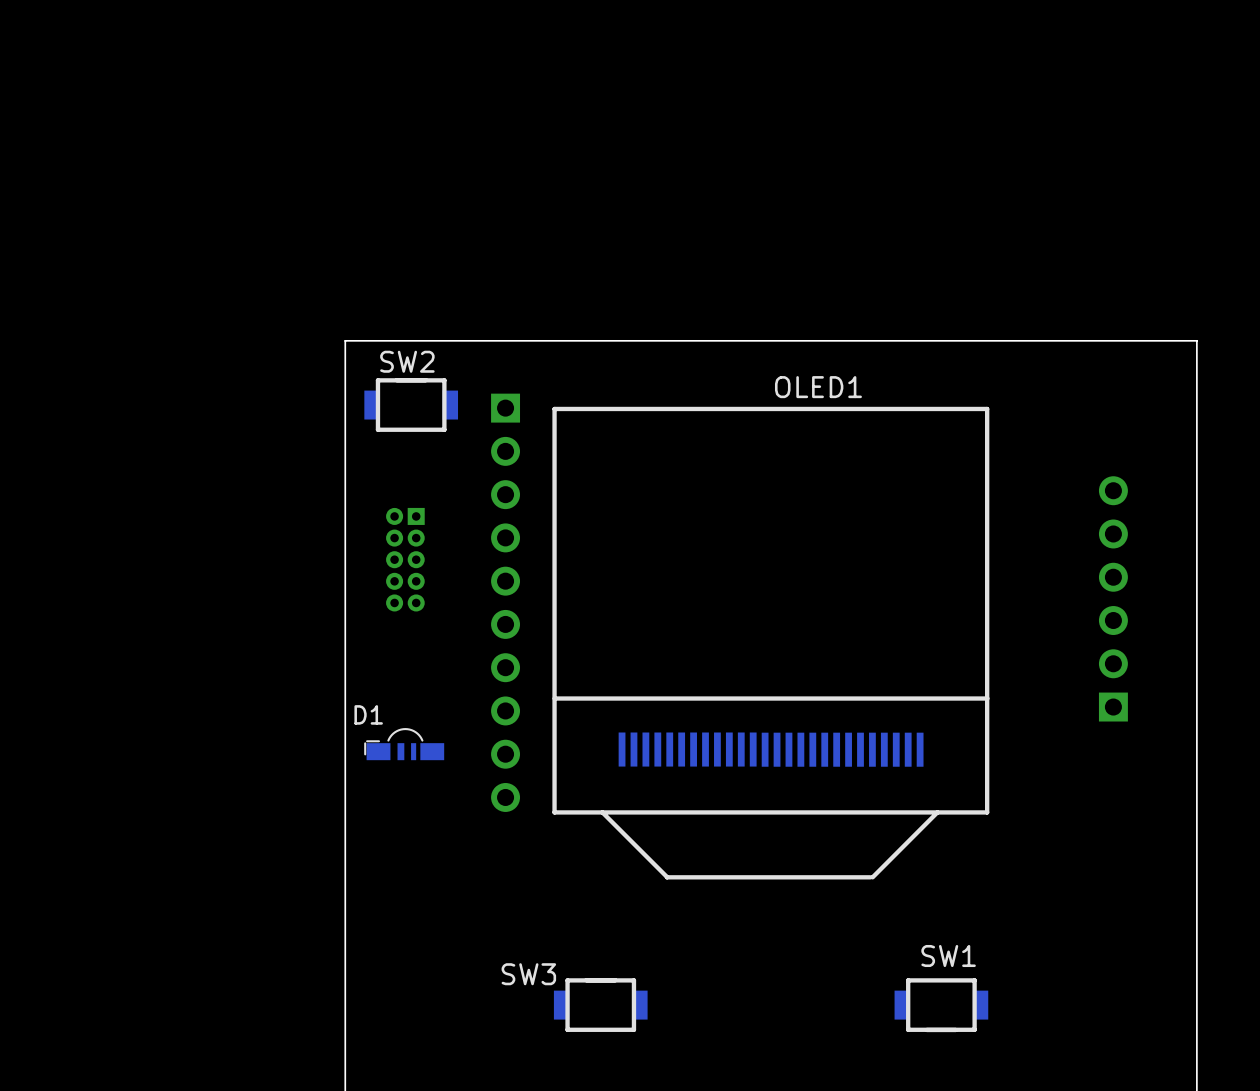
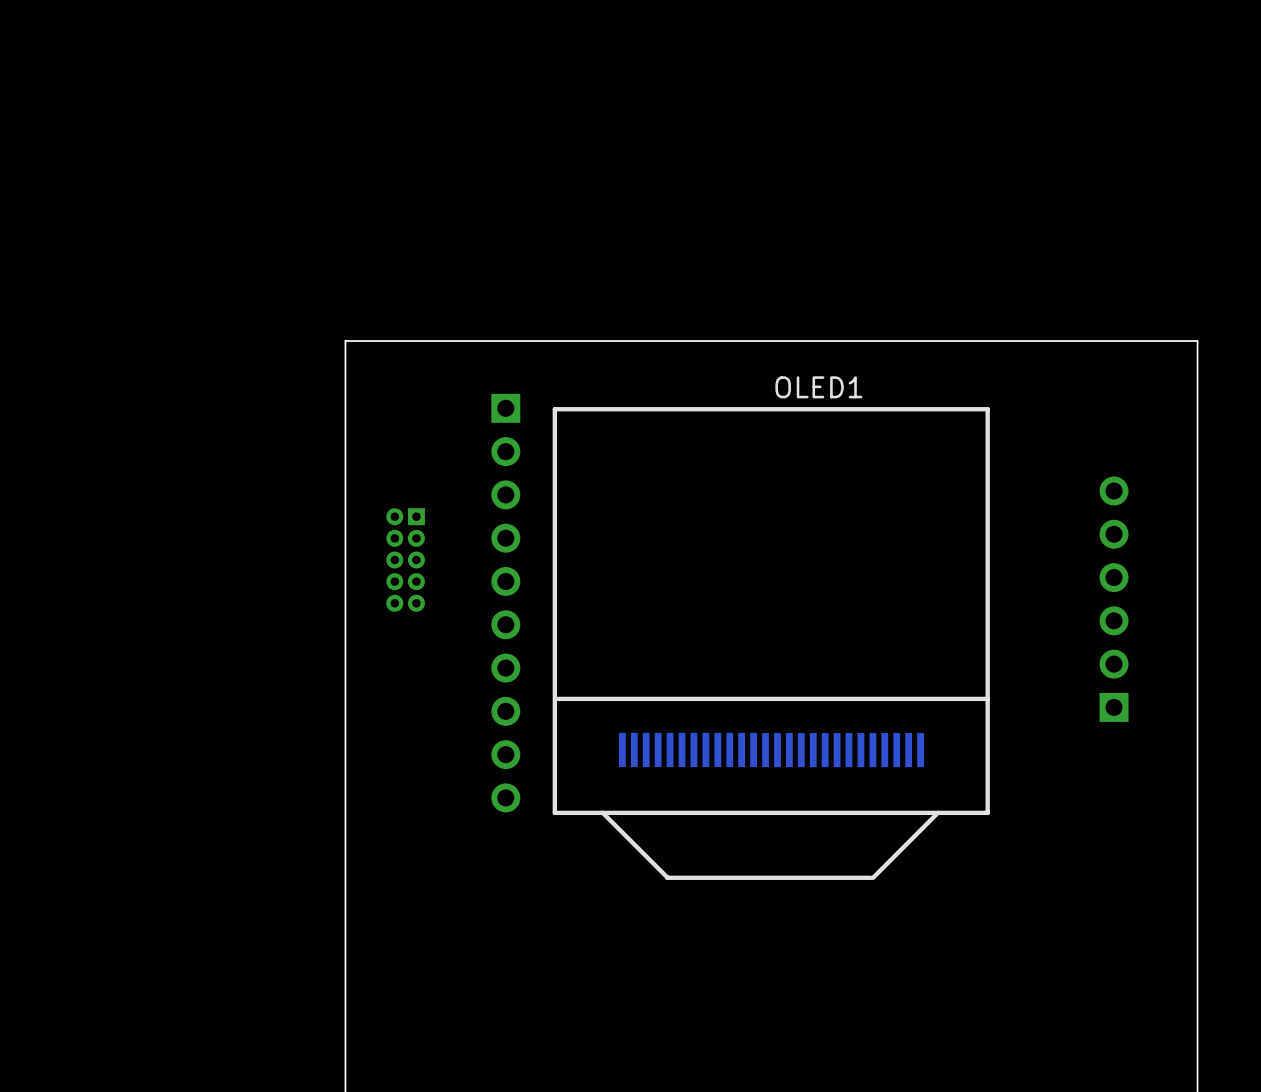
SW2: (411, 404) -> none
D1: (404, 744) -> none
SW3: (600, 1005) -> none
SW1: (941, 1005) -> none

